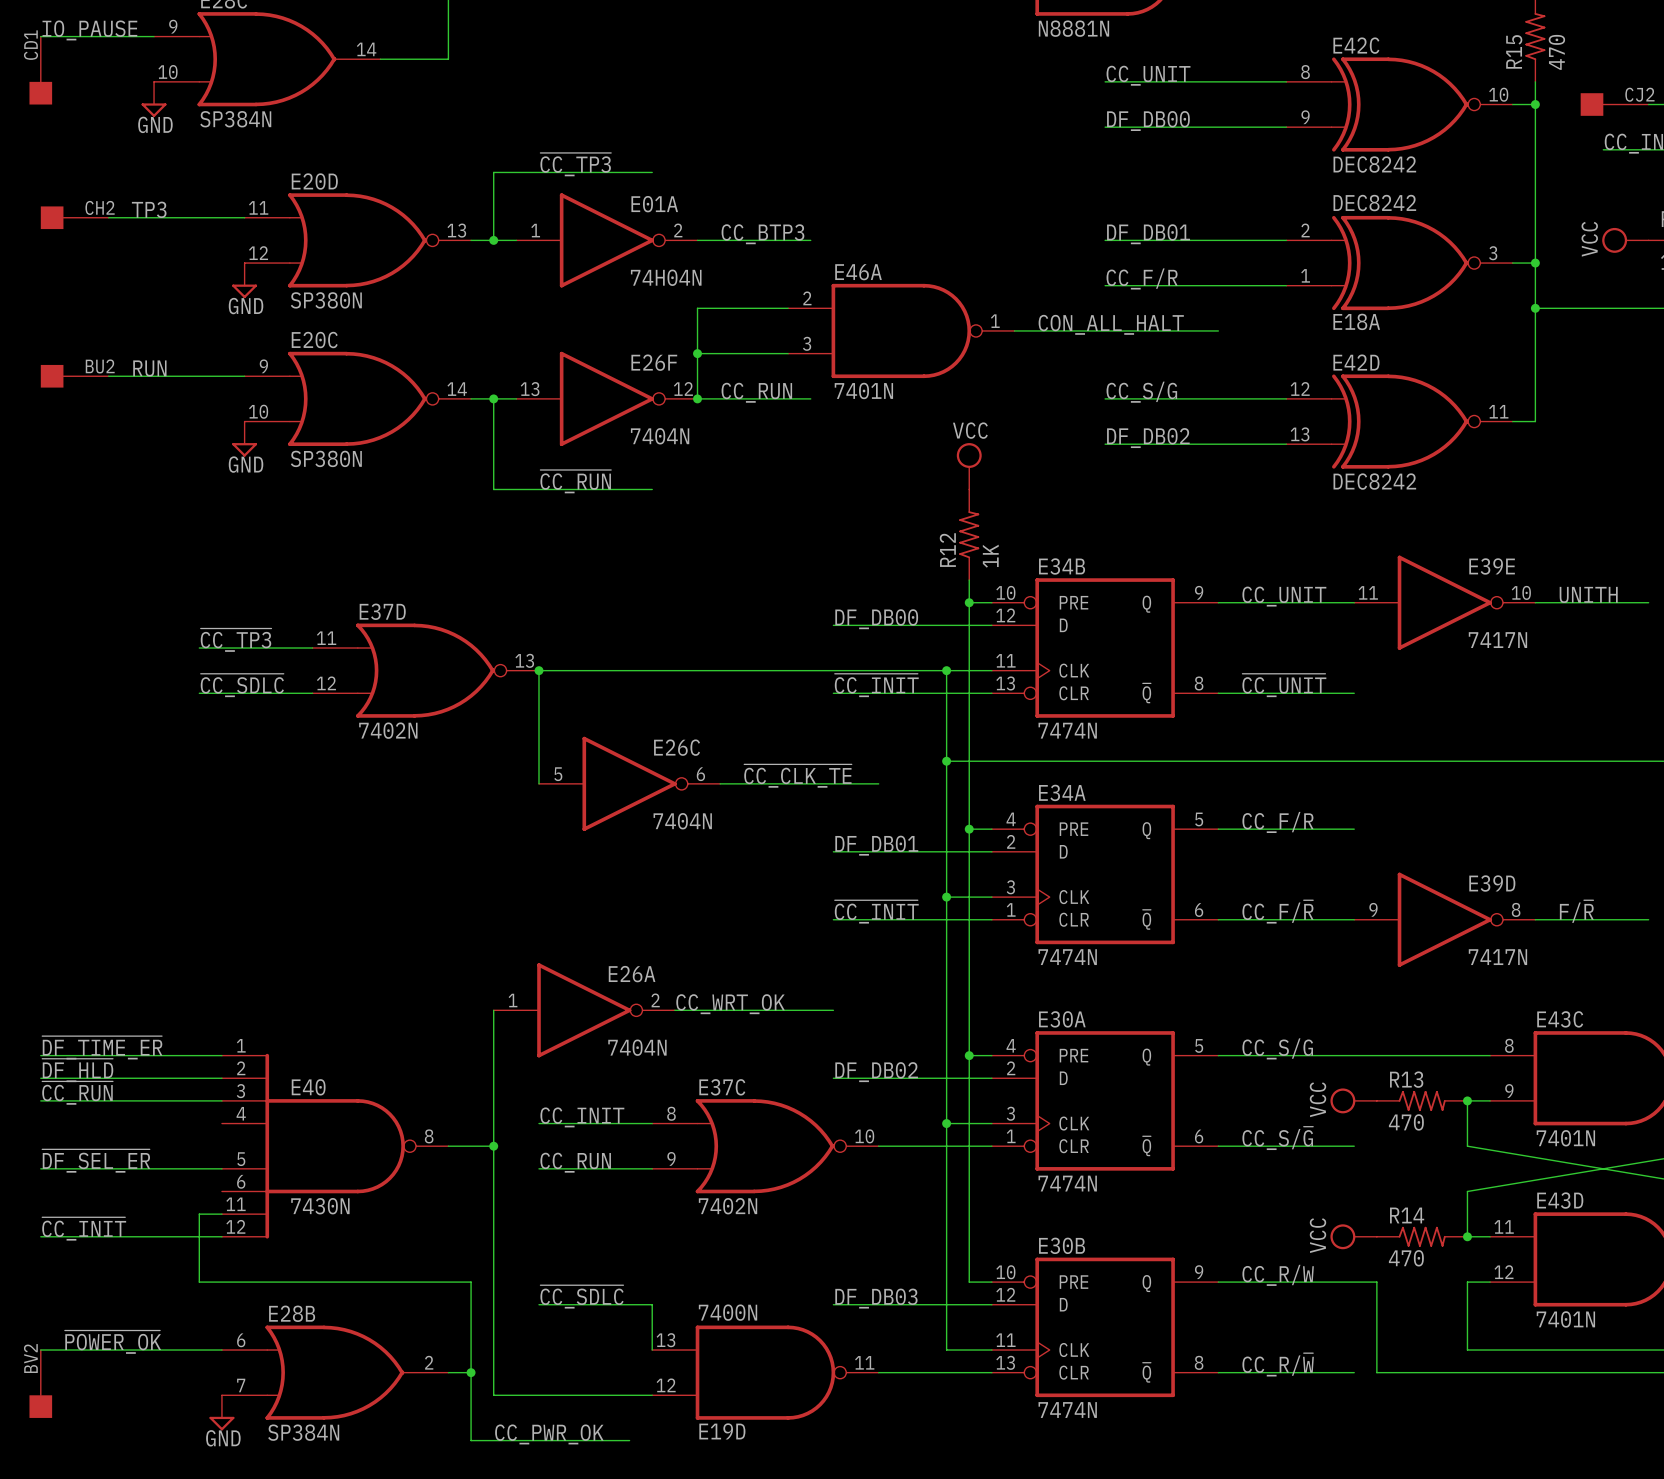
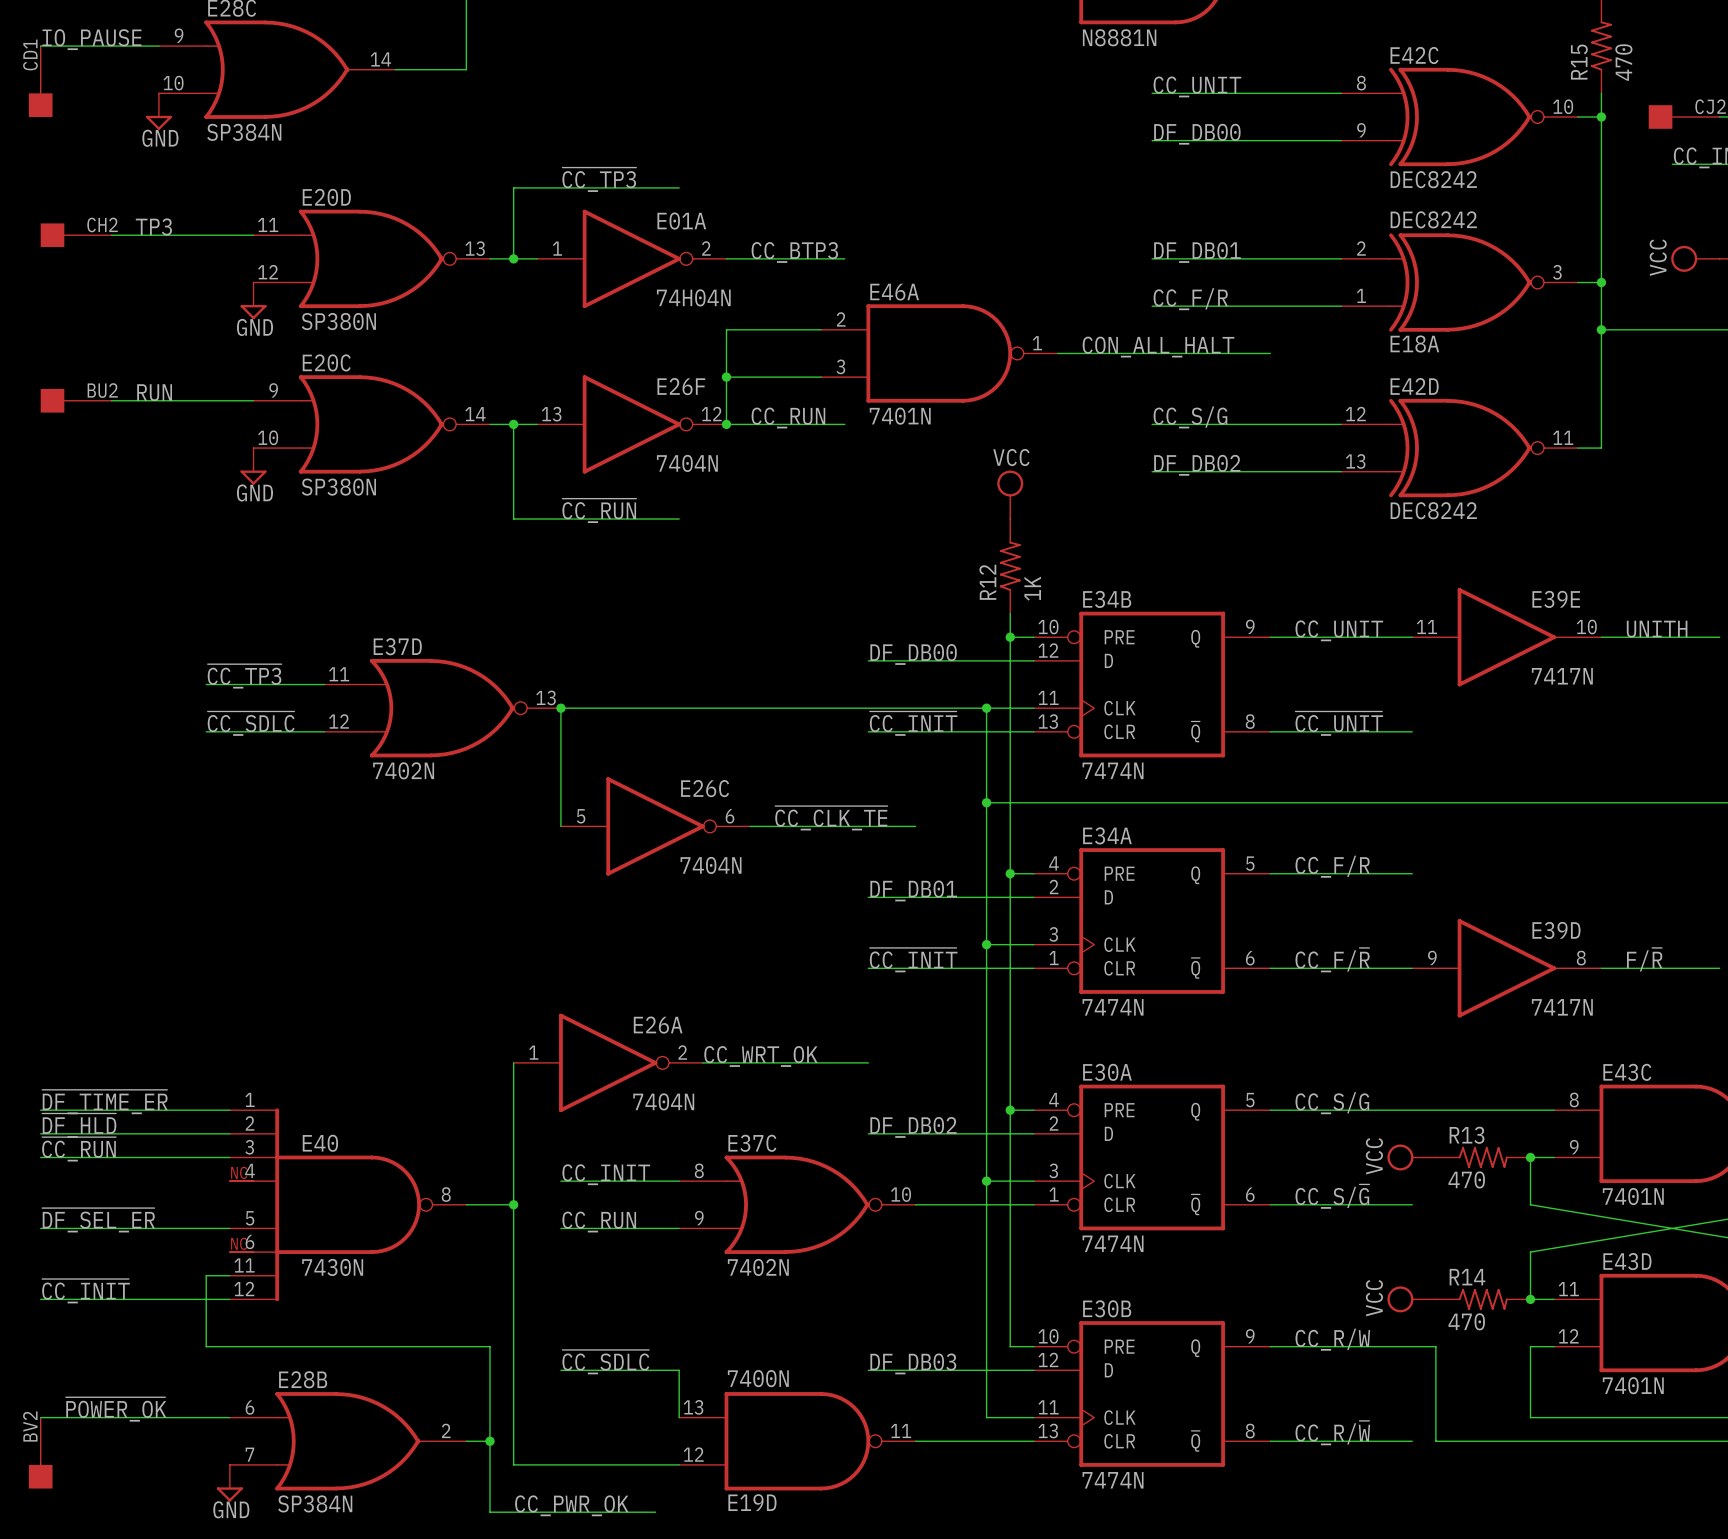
E39E symbol: [1354, 555, 1536, 650] -> [1412, 588, 1602, 687]
E39D symbol: [1354, 872, 1536, 967] -> [1412, 919, 1602, 1018]
power symbol: none -> (241, 1181)
power symbol: none -> (241, 1252)

